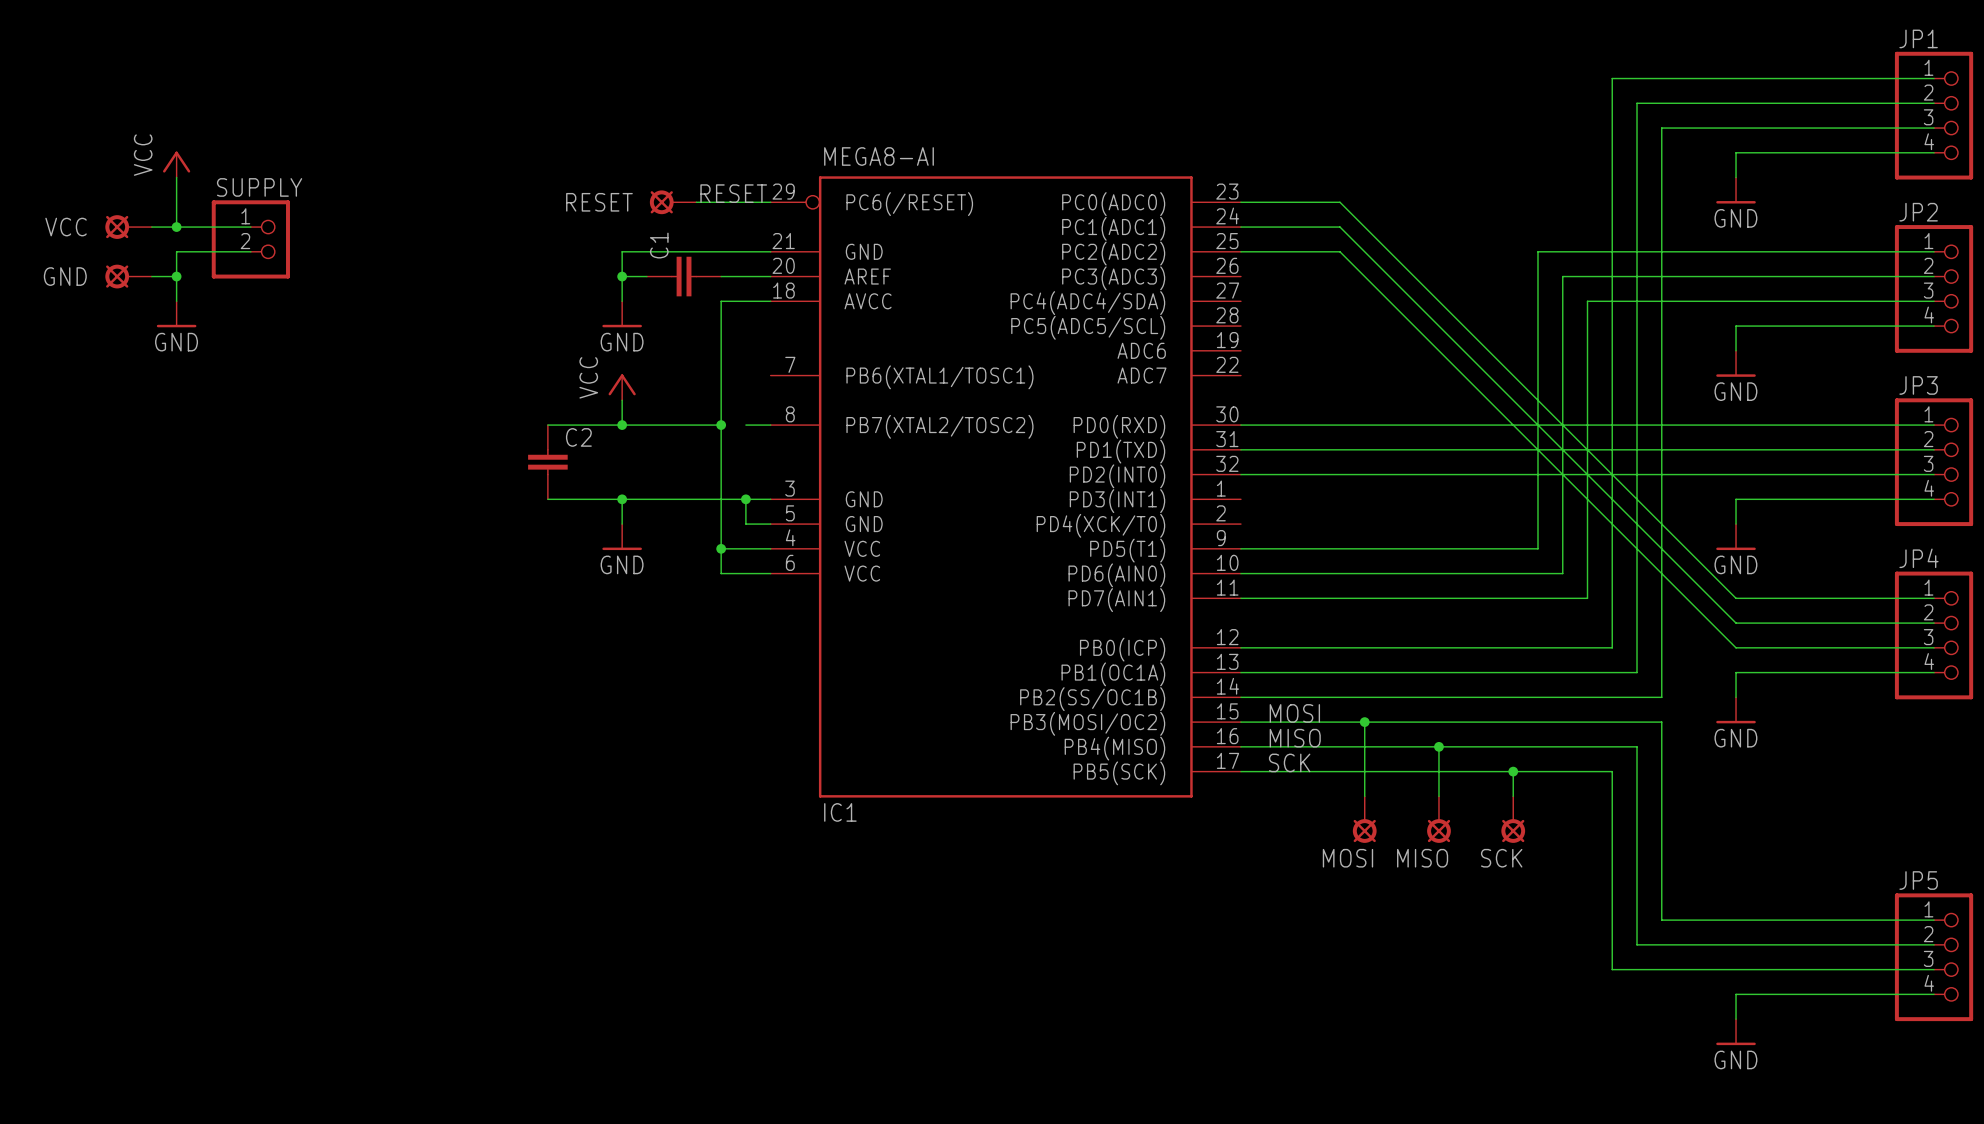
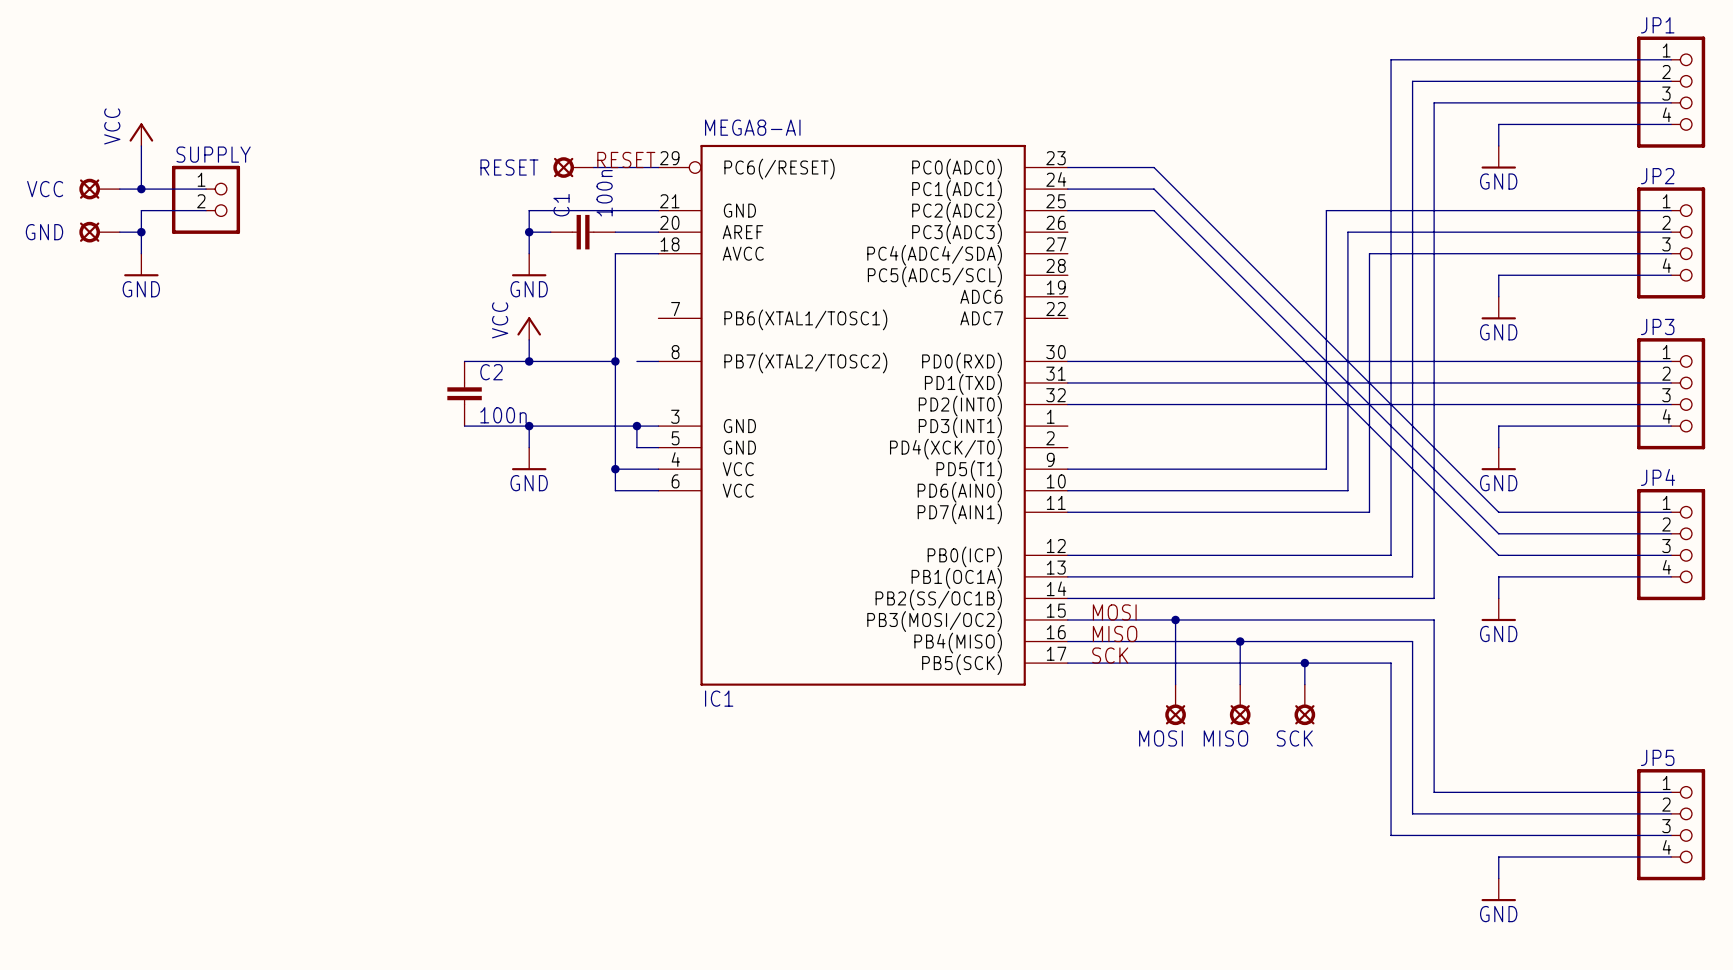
C1 value: none -> 100n (604, 193)
C2 value: none -> 100n (503, 415)

